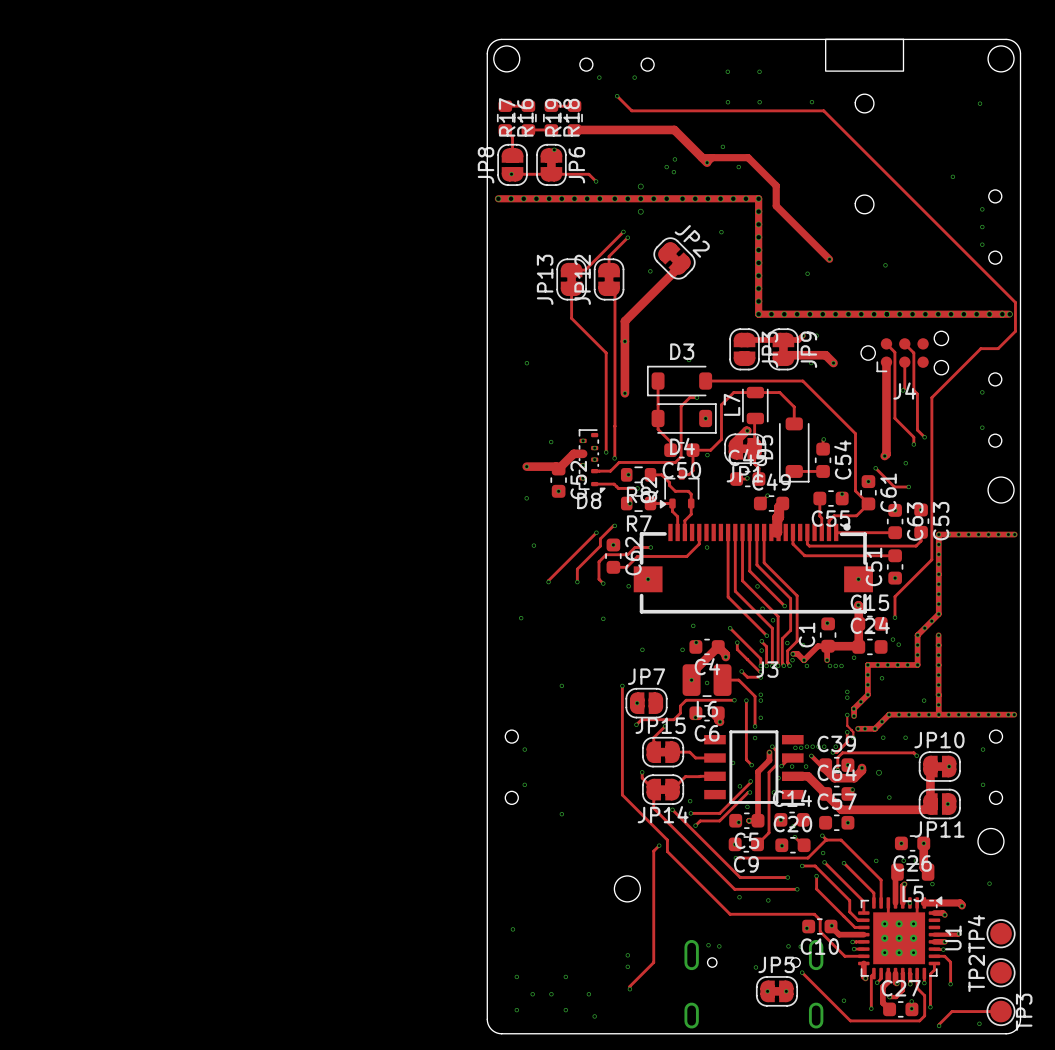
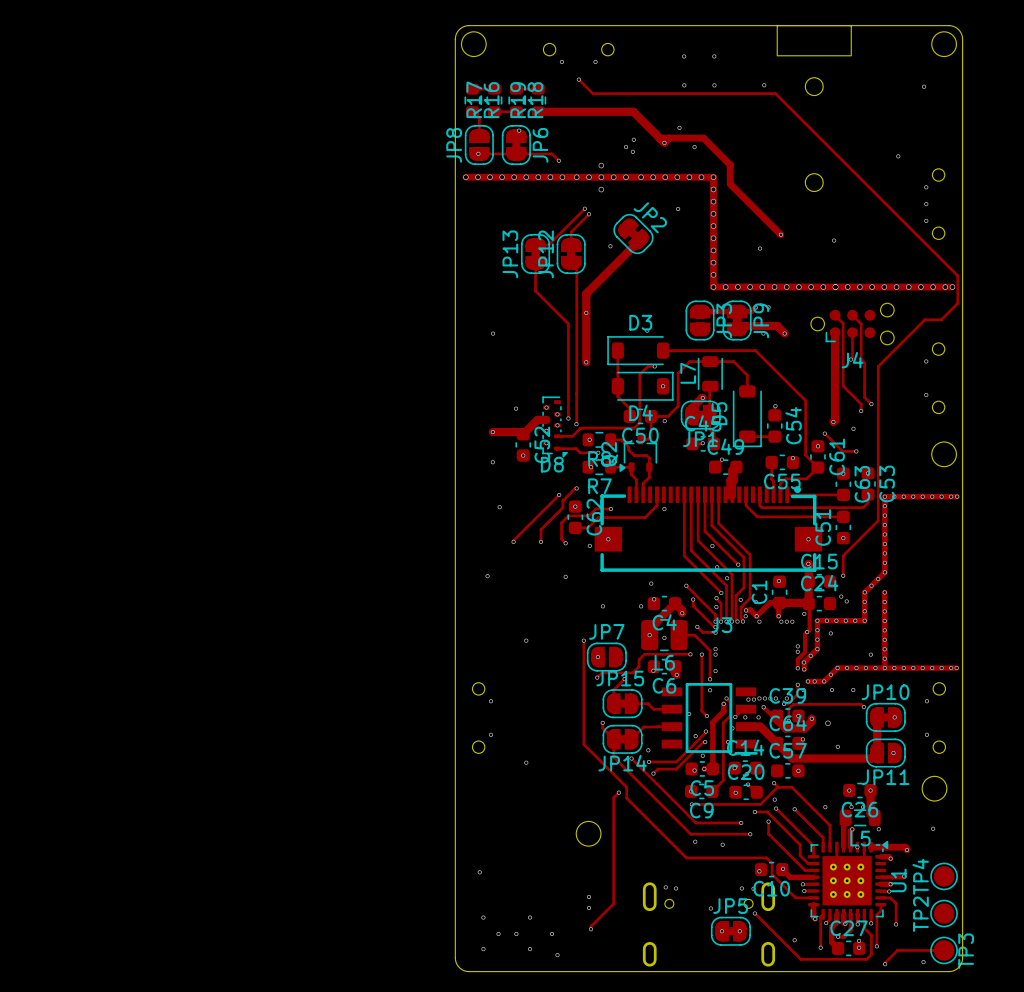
via: none -> (807, 632)
track: (847, 714) (847, 725) (853, 731) (853, 737) -> (797, 668) (797, 659) (805, 652) (805, 634) (809, 629) (808, 603)

